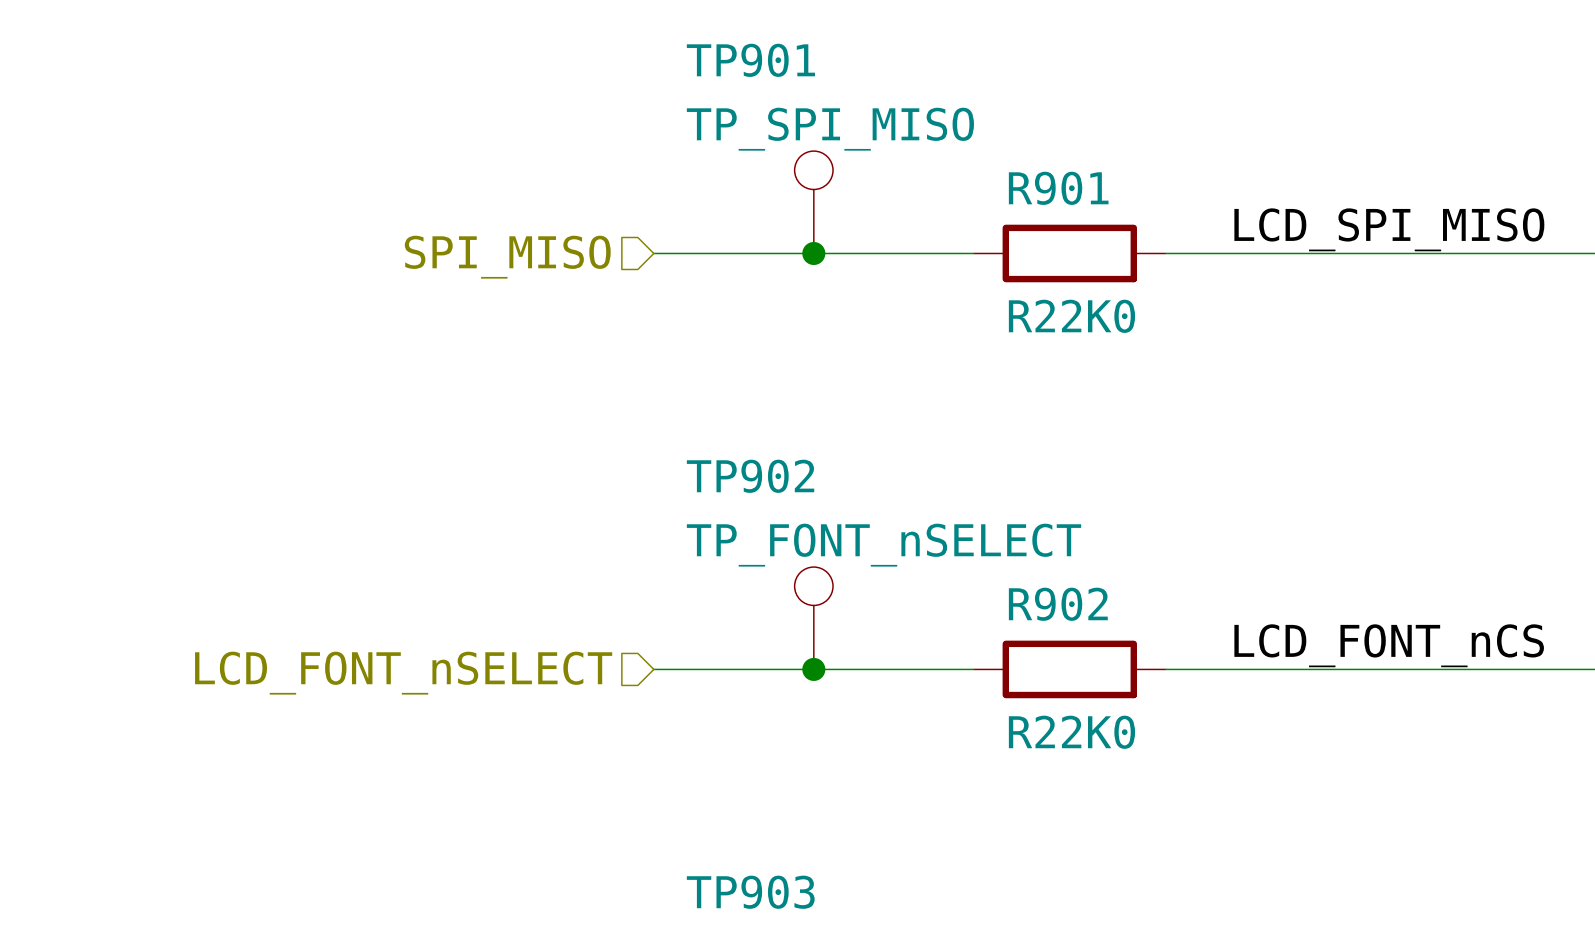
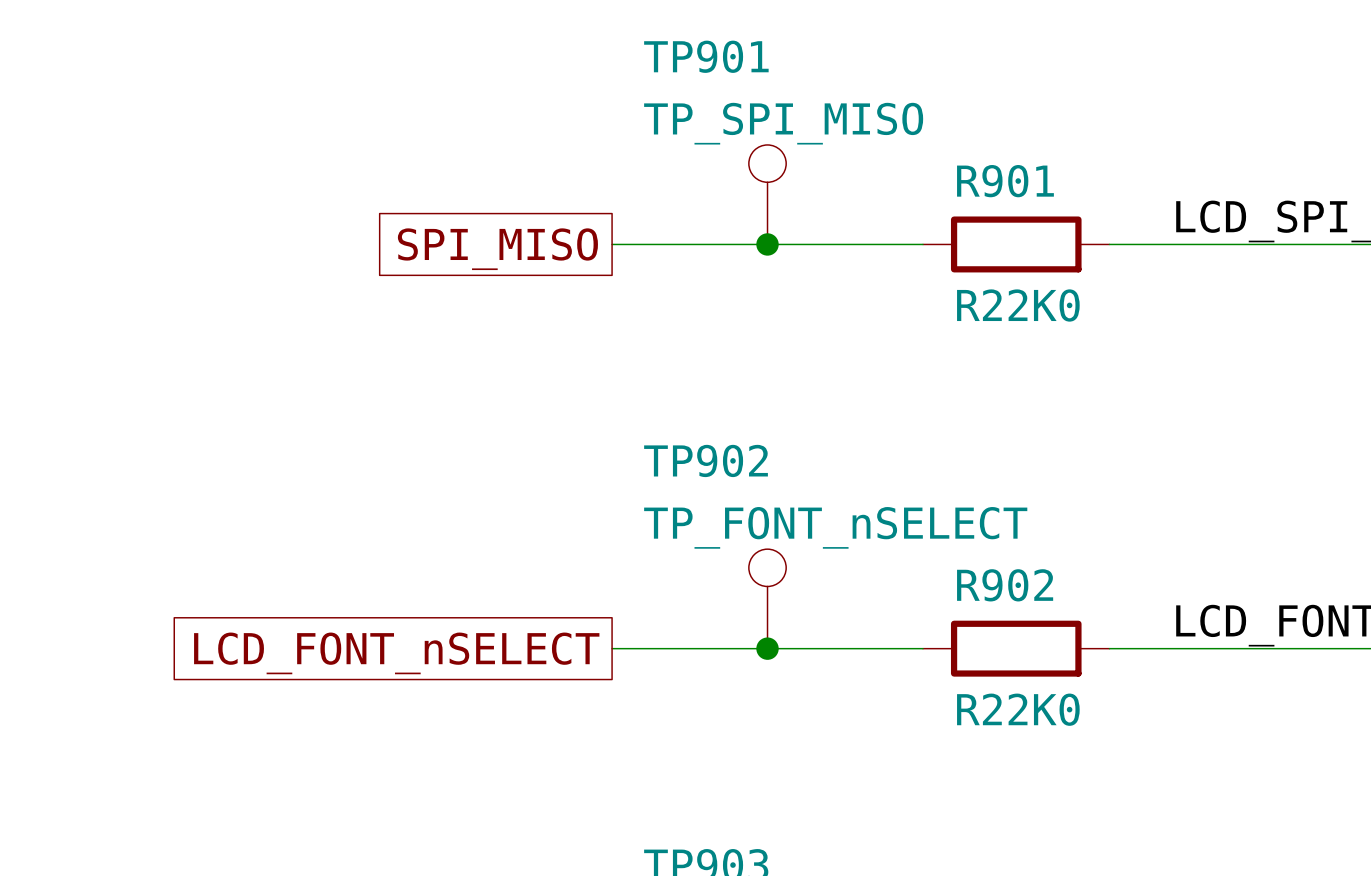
hierarchical label: SPI_MISO (507, 257) -> none
global label: none -> SPI_MISO (497, 249)
hierarchical label: LCD_FONT_nSELECT (403, 673) -> none
global label: none -> LCD_FONT_nSELECT (396, 653)

